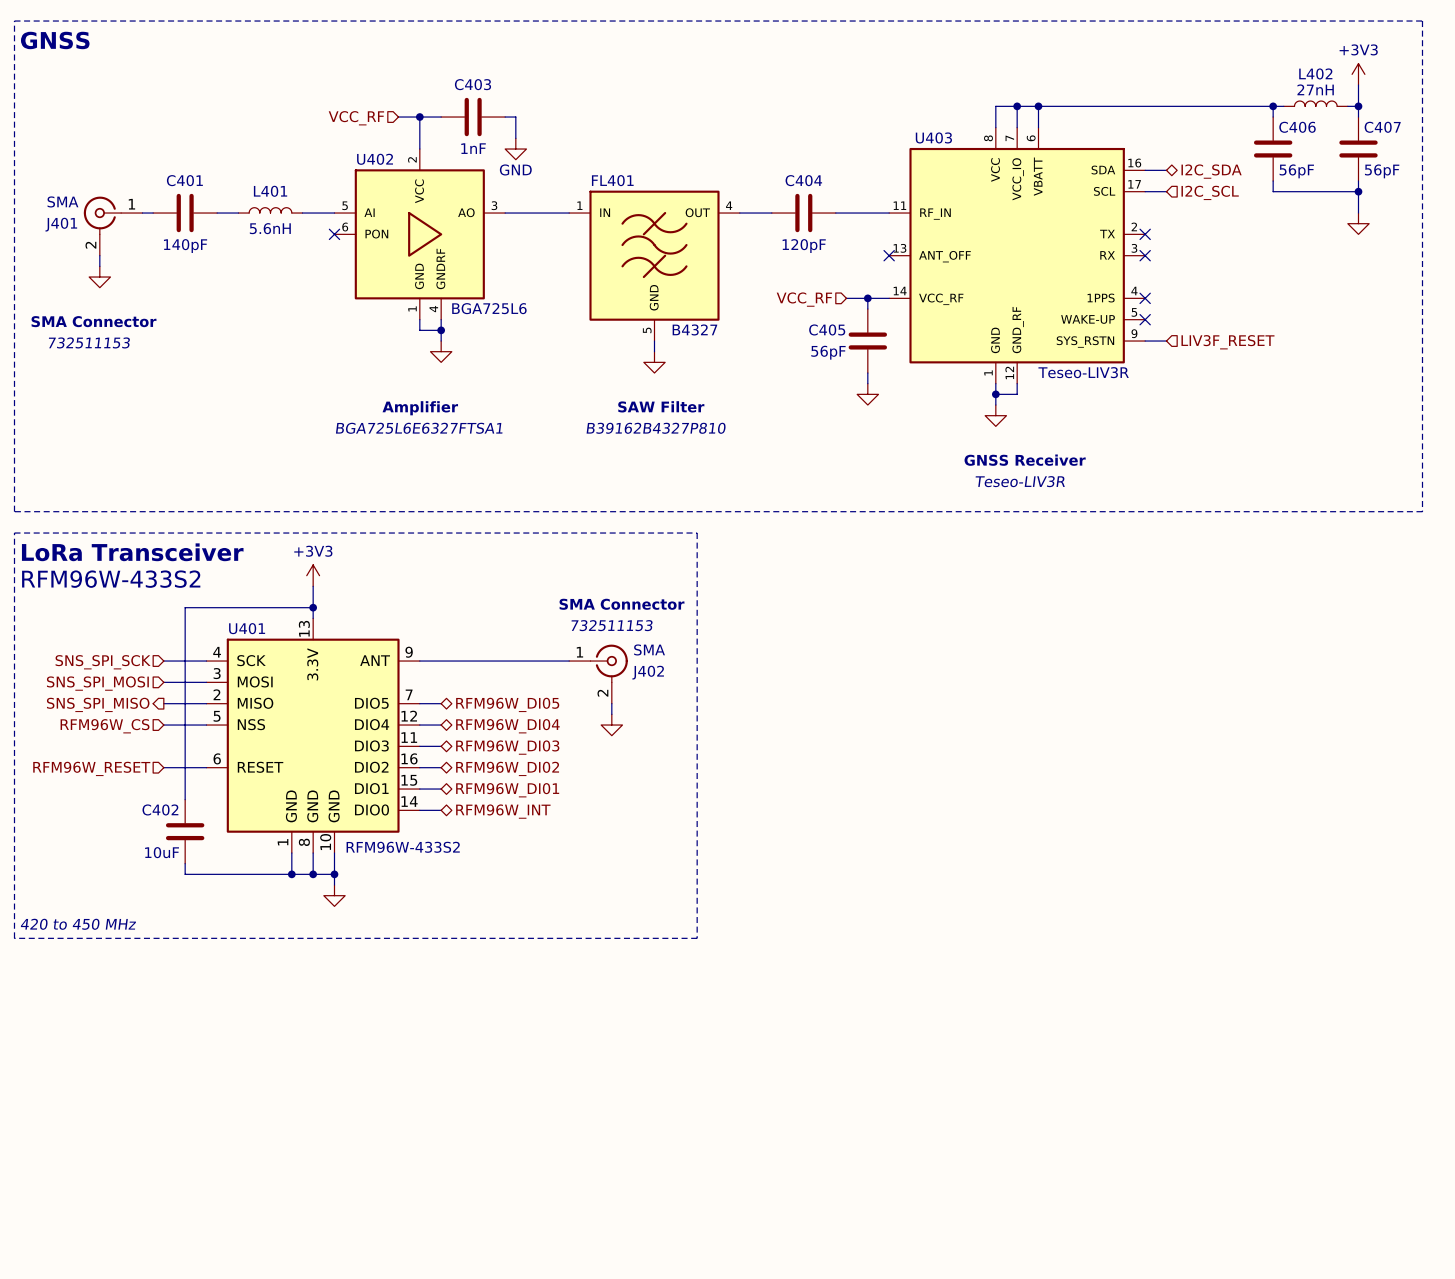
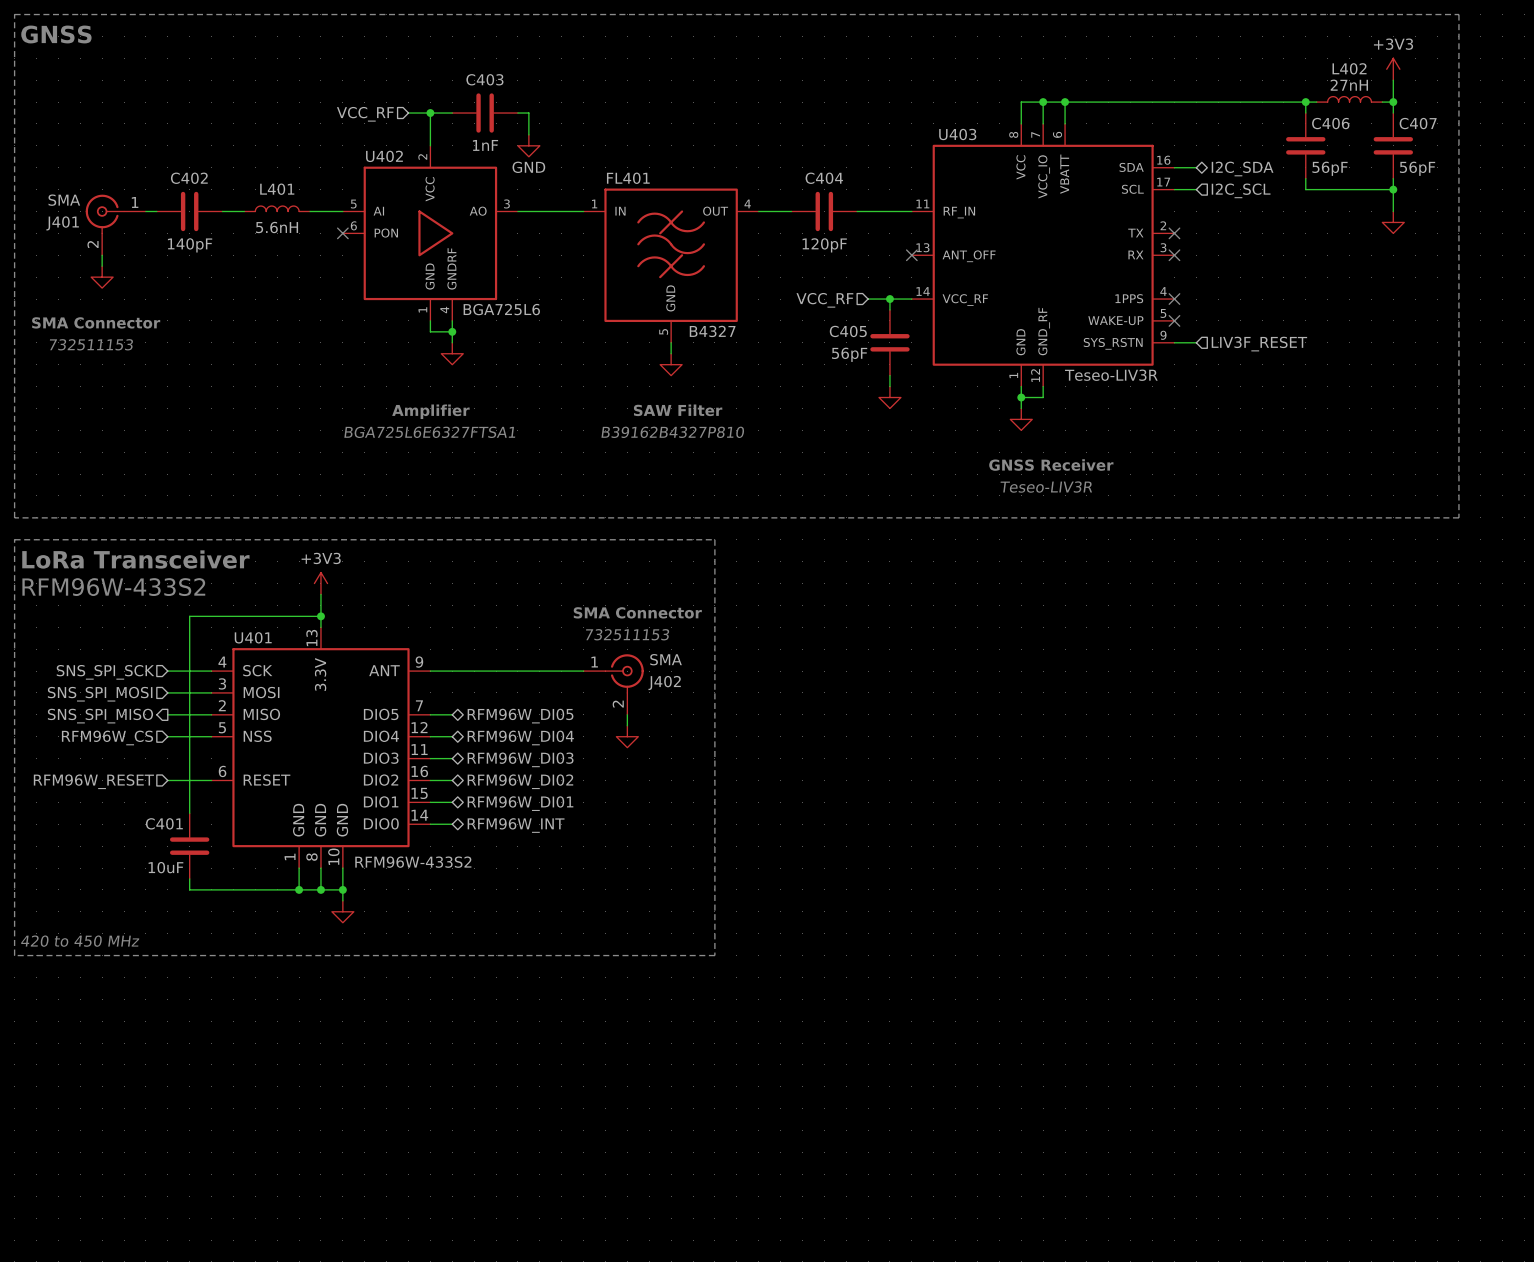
C401 name: C401 (184, 180) -> C402 (189, 178)
C402 name: C402 (160, 809) -> C401 (164, 823)

